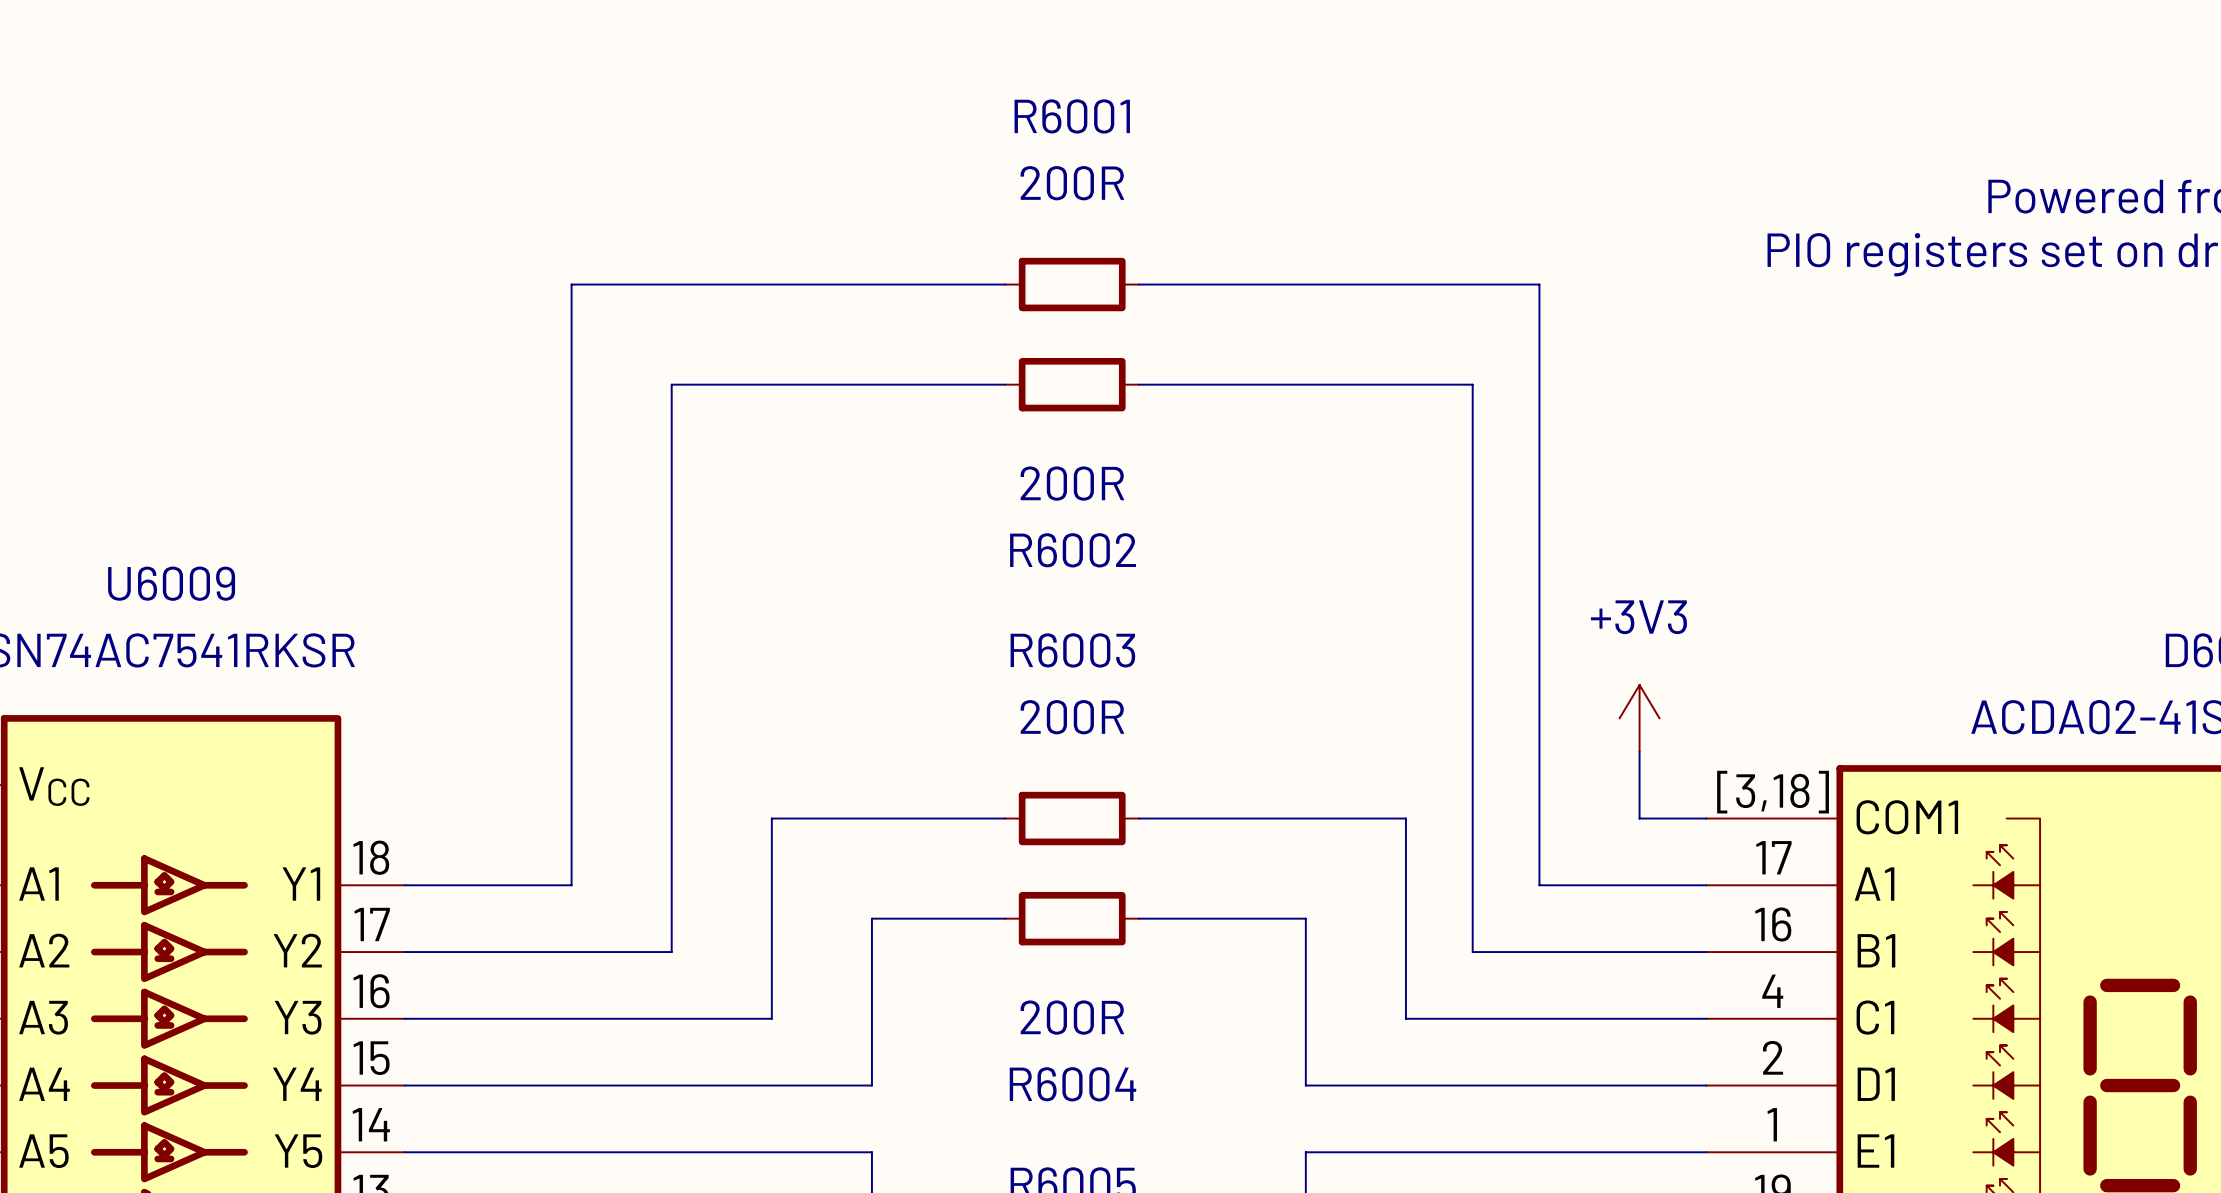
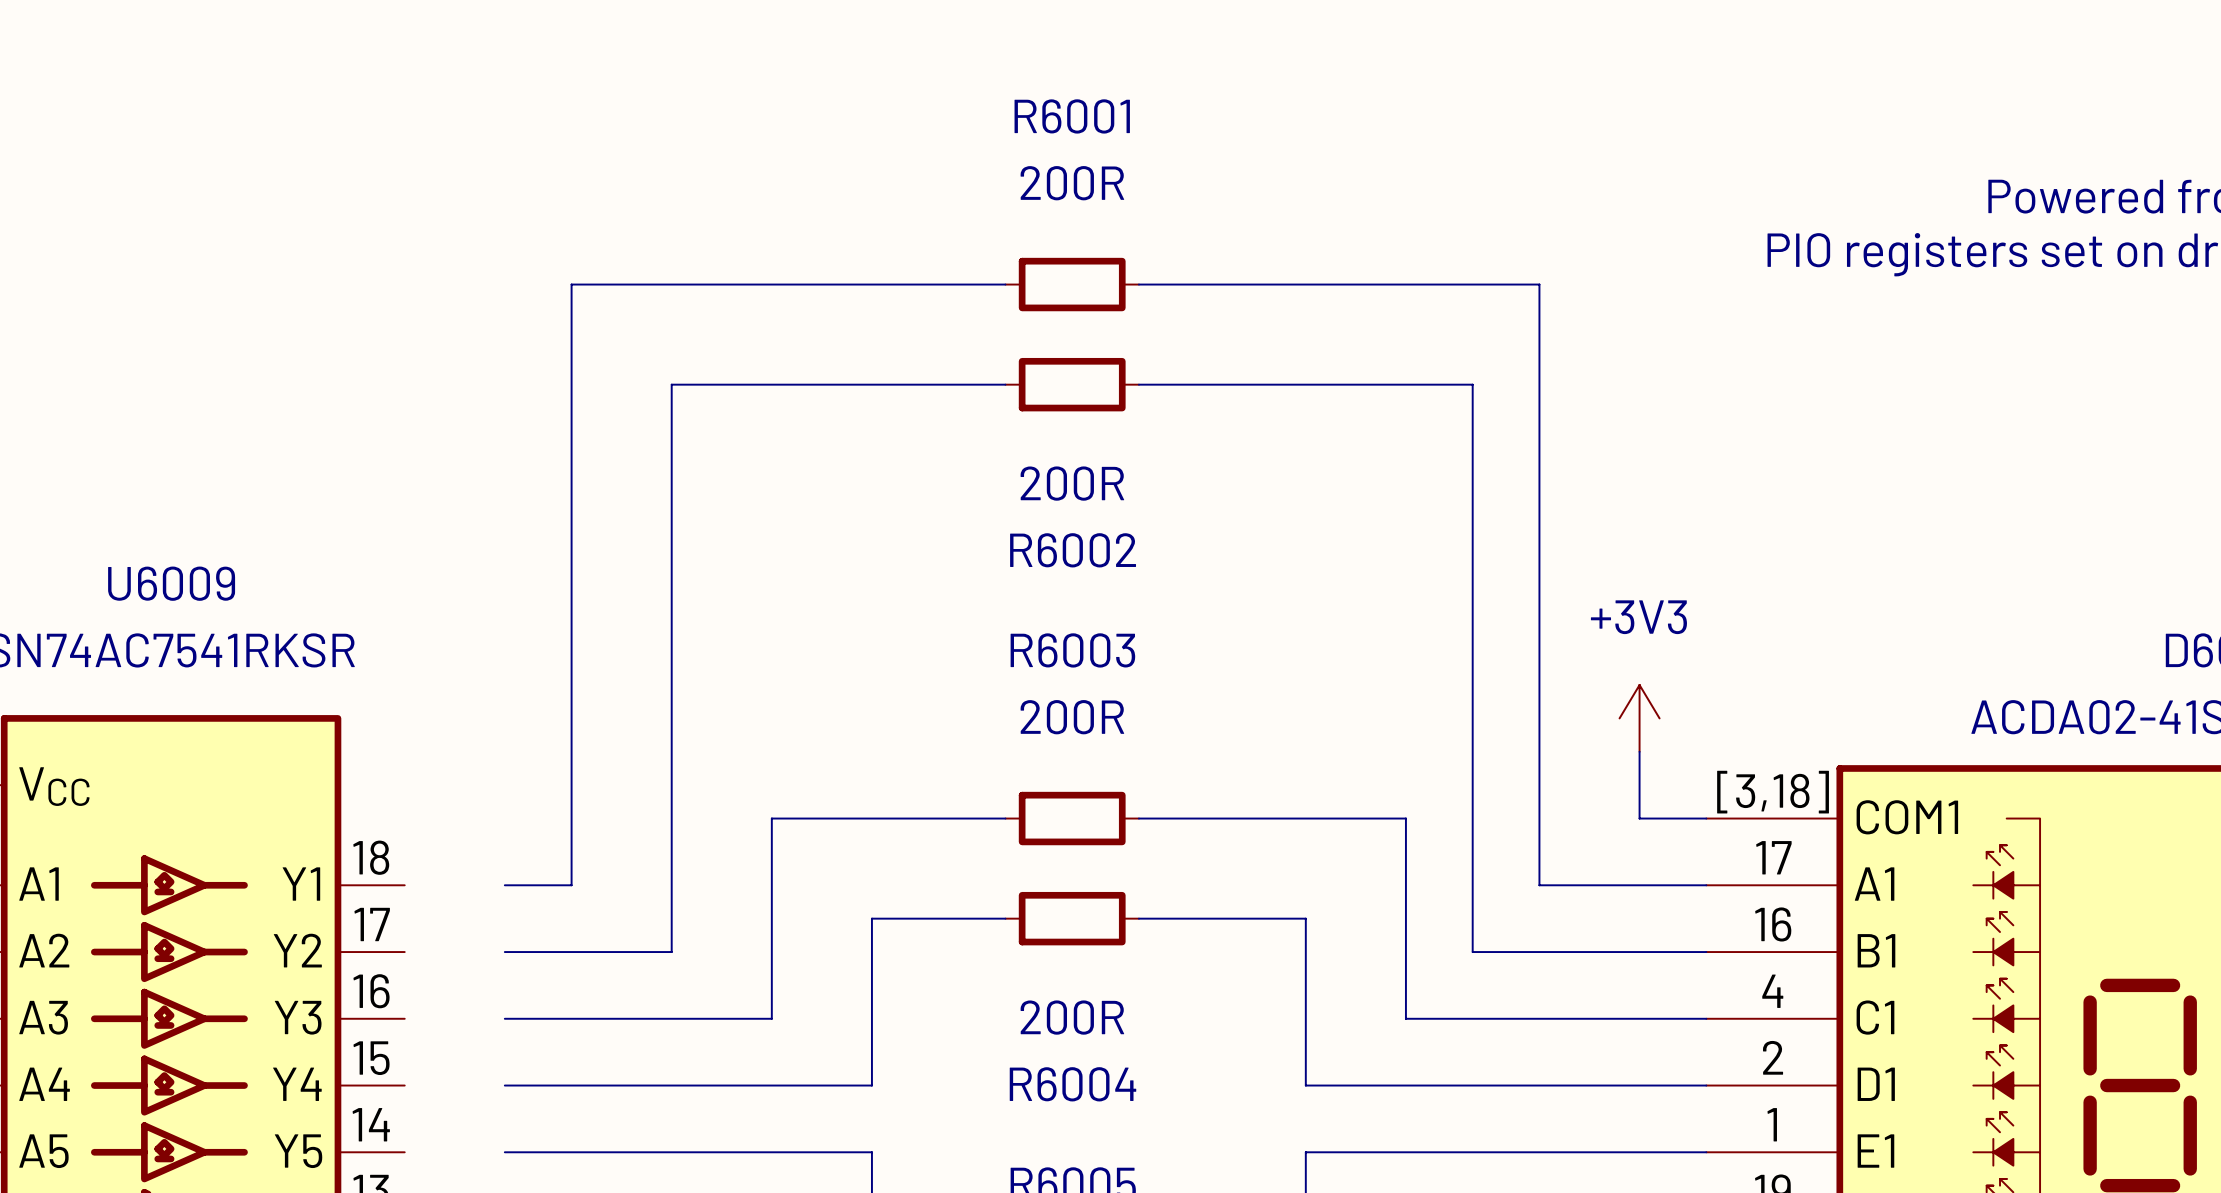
wire: (404, 885) (504, 885) -> none
wire: (404, 952) (504, 952) -> none
wire: (404, 1018) (504, 1018) -> none
wire: (404, 1085) (504, 1085) -> none
wire: (404, 1152) (504, 1152) -> none

